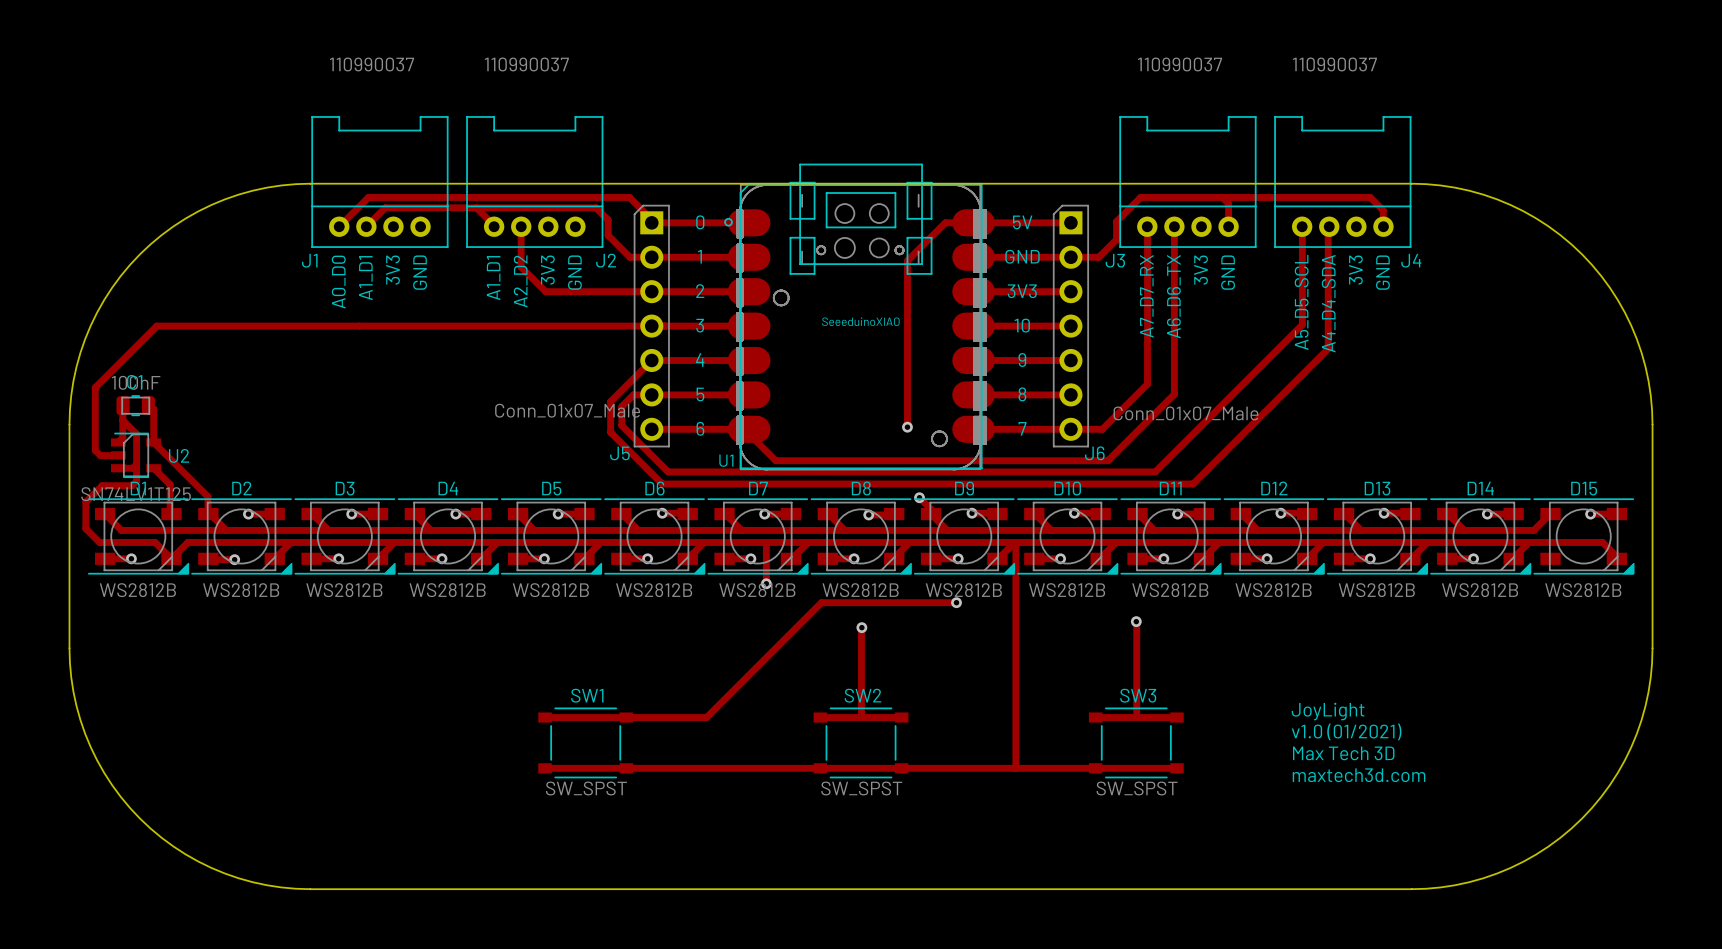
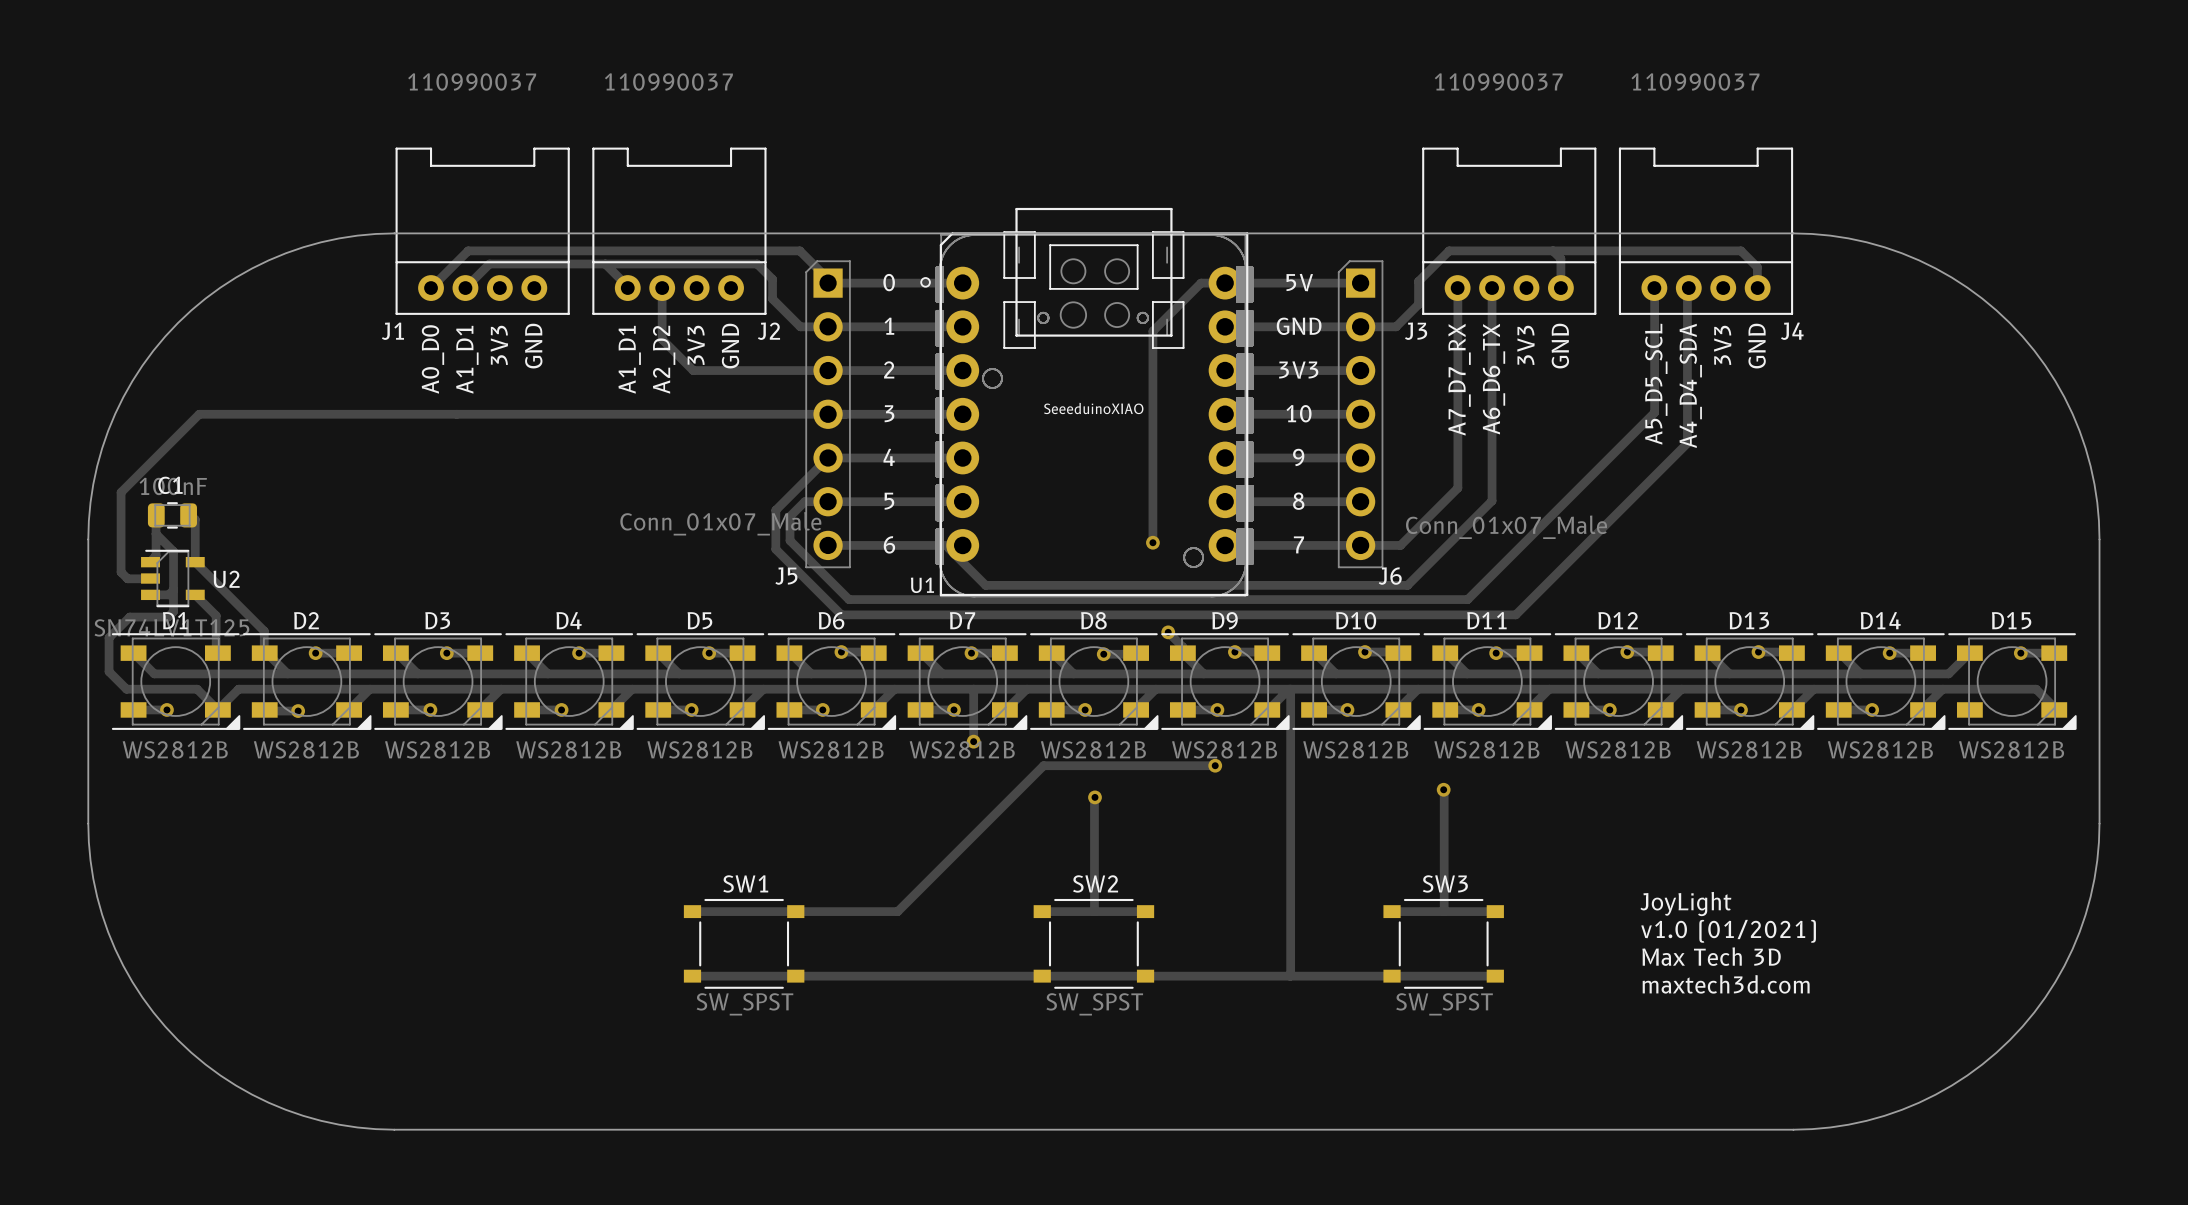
U1 footprint: [724, 163, 995, 470] -> [920, 207, 1253, 597]

